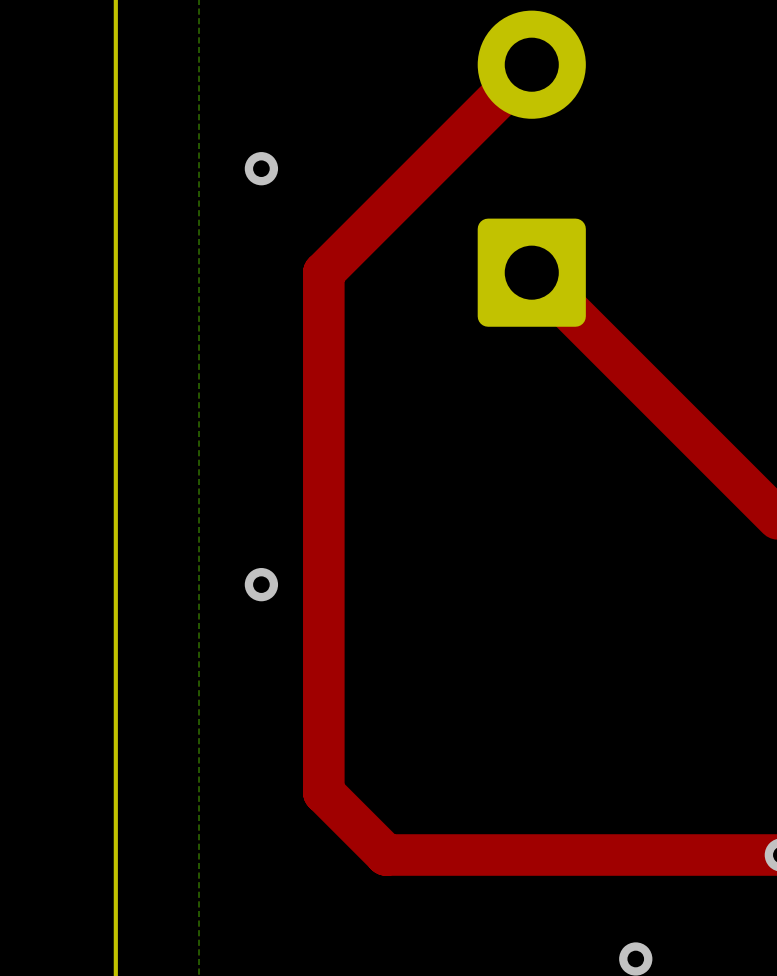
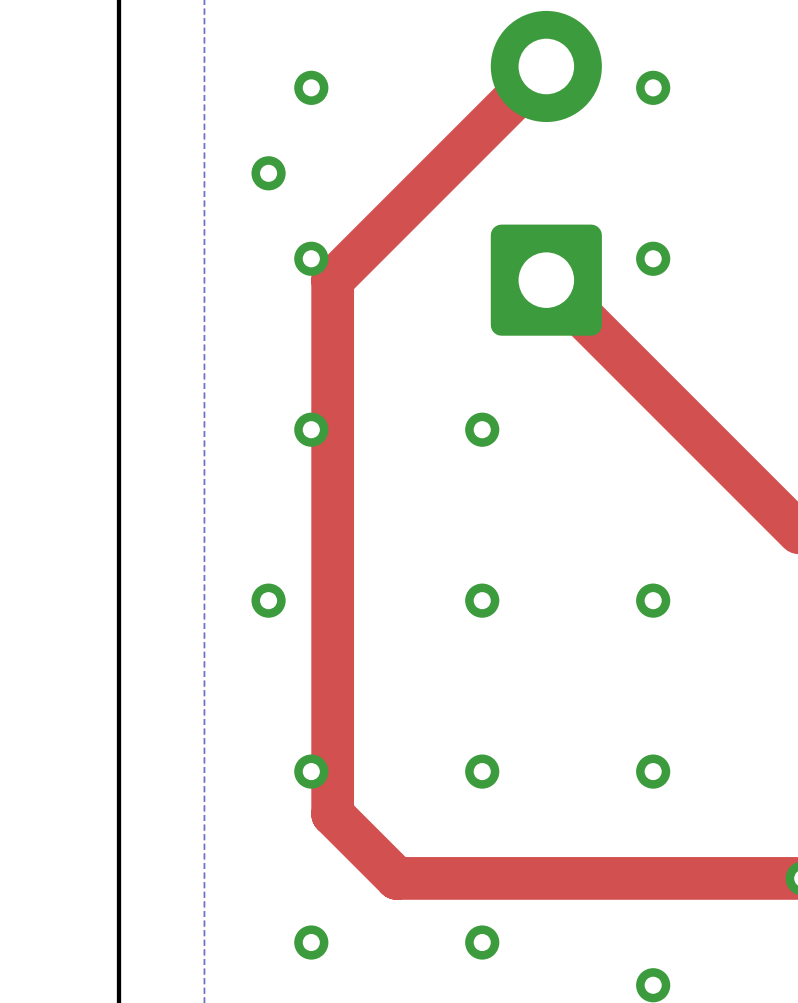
via: none -> (311, 87)
via: none -> (653, 87)
via: none -> (311, 258)
via: none -> (653, 258)
via: none -> (311, 429)
via: none -> (482, 429)
via: none -> (482, 600)
via: none -> (653, 600)
via: none -> (311, 771)
via: none -> (482, 771)
via: none -> (653, 771)
via: none -> (311, 942)
via: none -> (482, 942)

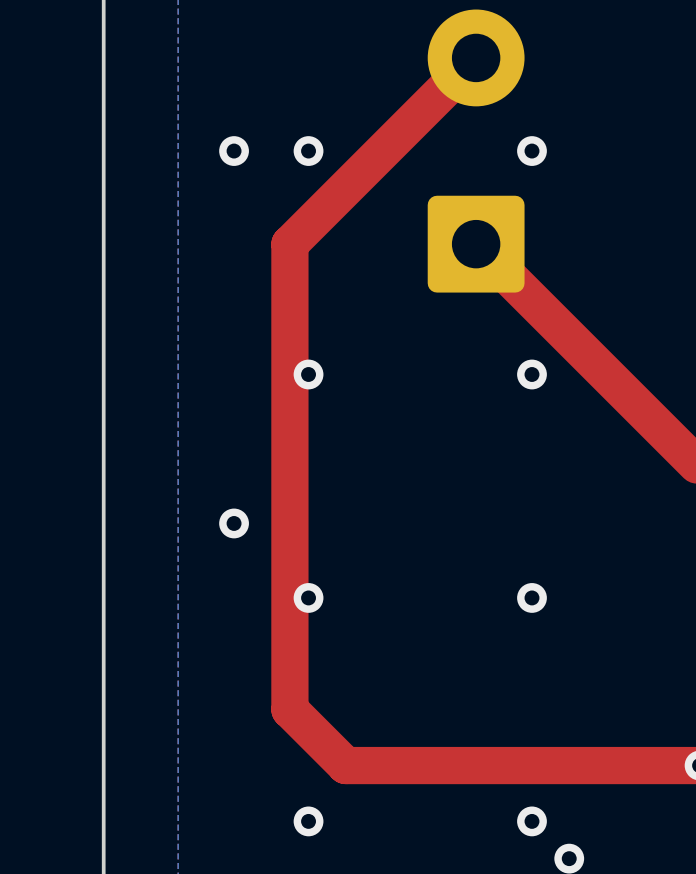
via: (311, 87) -> none
via: (653, 87) -> none
via: none -> (308, 151)
via: none -> (531, 151)
via: (311, 258) -> none
via: (653, 258) -> none
via position: (311, 429) -> (308, 374)
via: (482, 429) -> none
via: none -> (531, 374)
via: (482, 600) -> none
via: (653, 600) -> none
via: none -> (308, 597)
via: none -> (531, 597)
via: (311, 771) -> none
via: (482, 771) -> none
via: (653, 771) -> none
via position: (311, 942) -> (308, 821)
via: (482, 942) -> none
via: none -> (531, 821)

